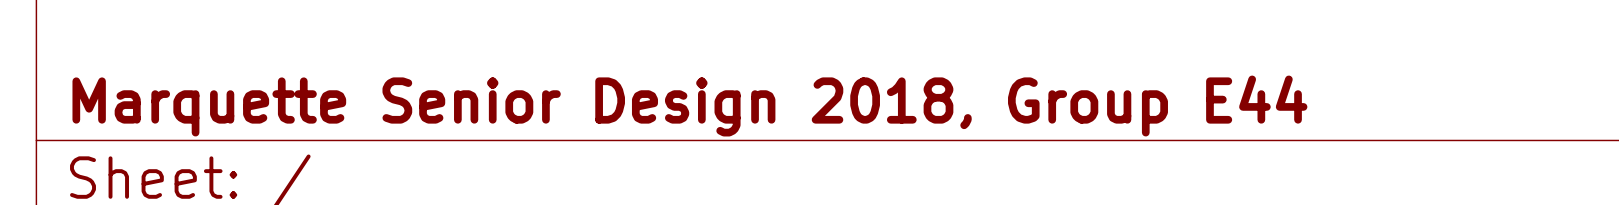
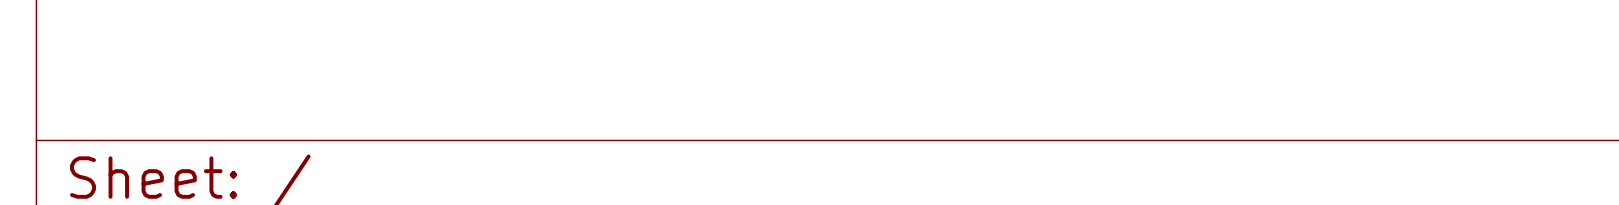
title block: Marquette Senior Design 2018, Group E44 (689, 106) -> none

